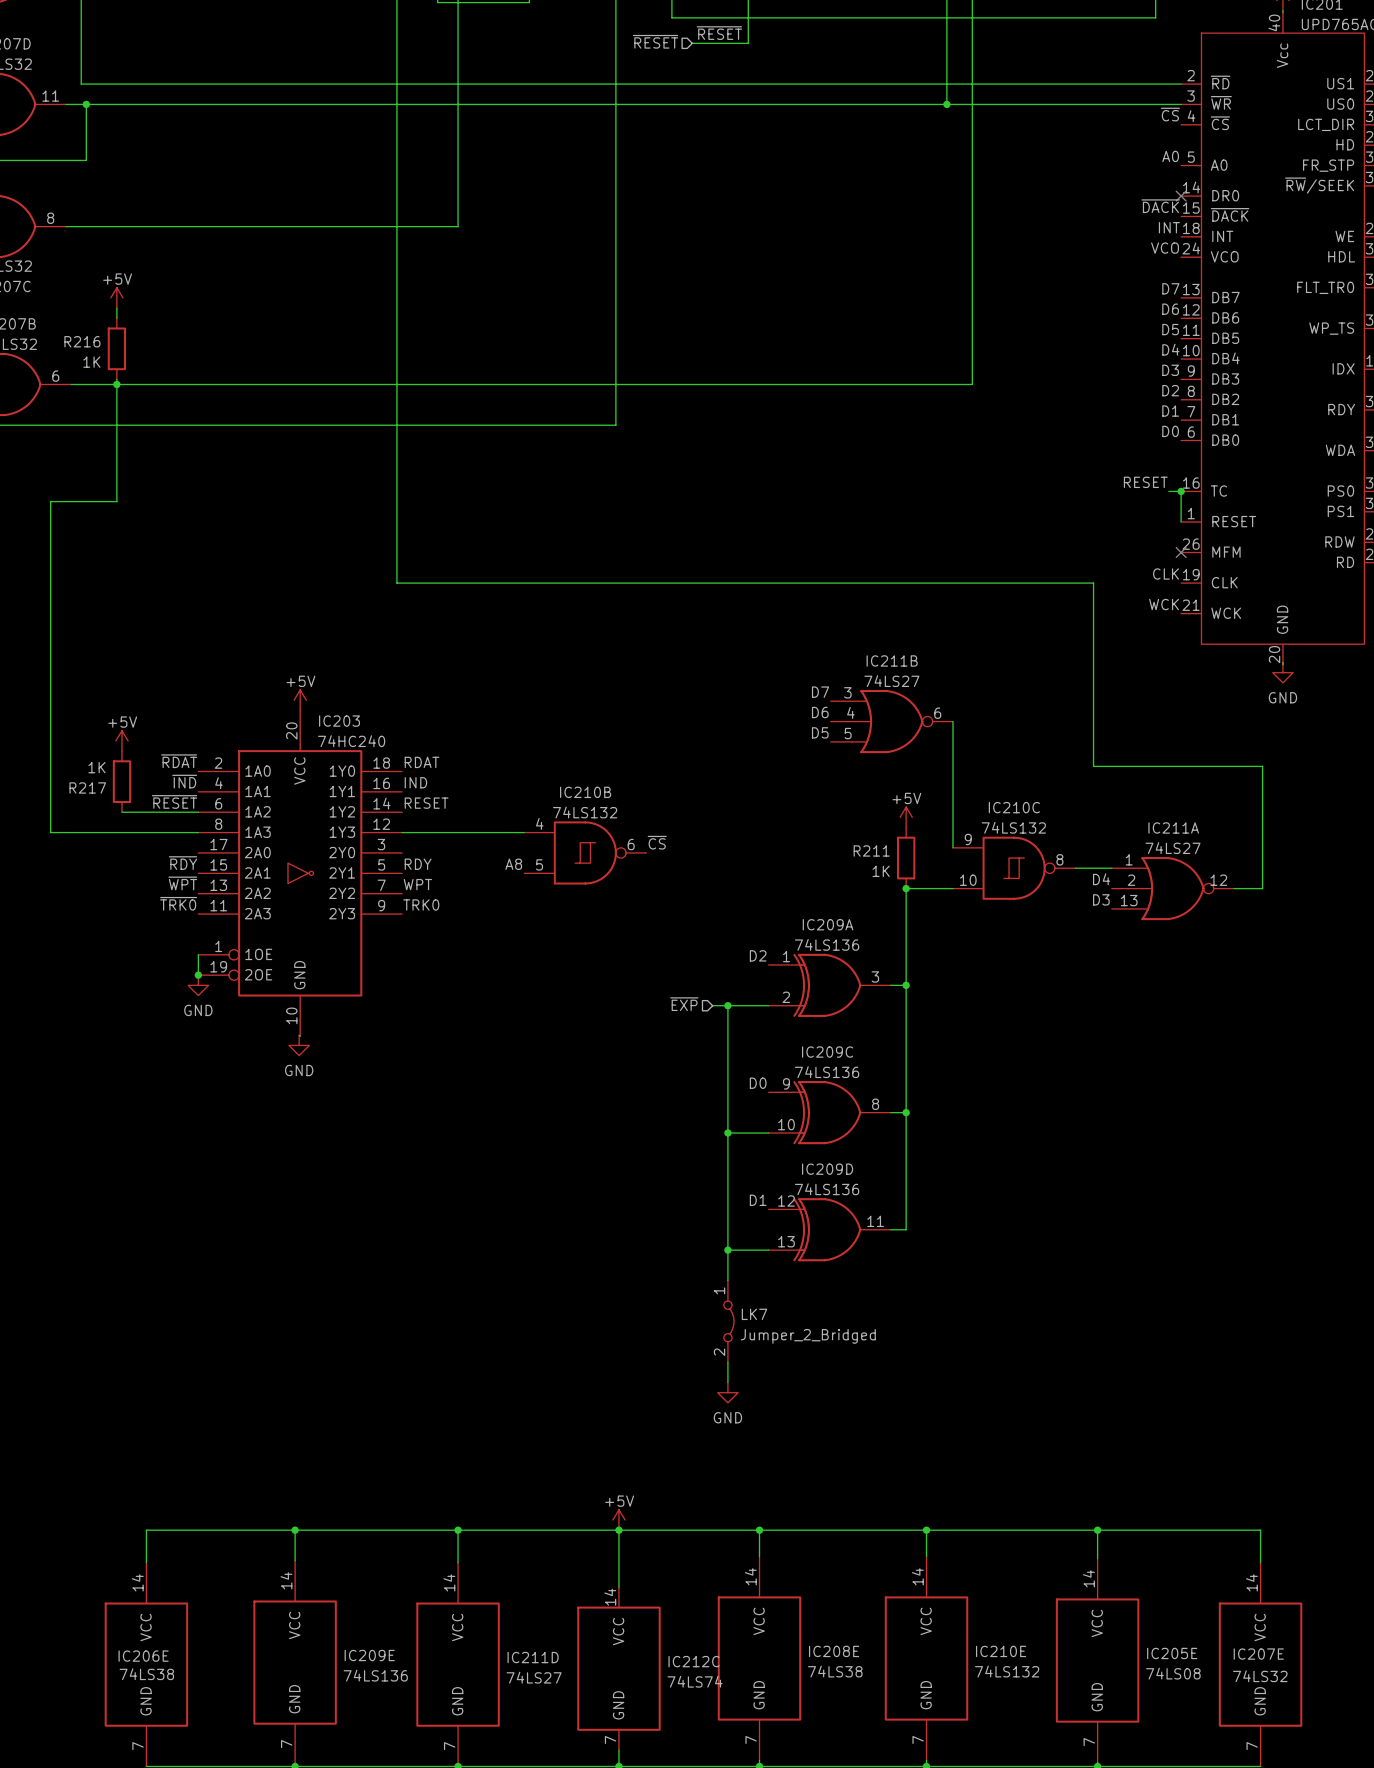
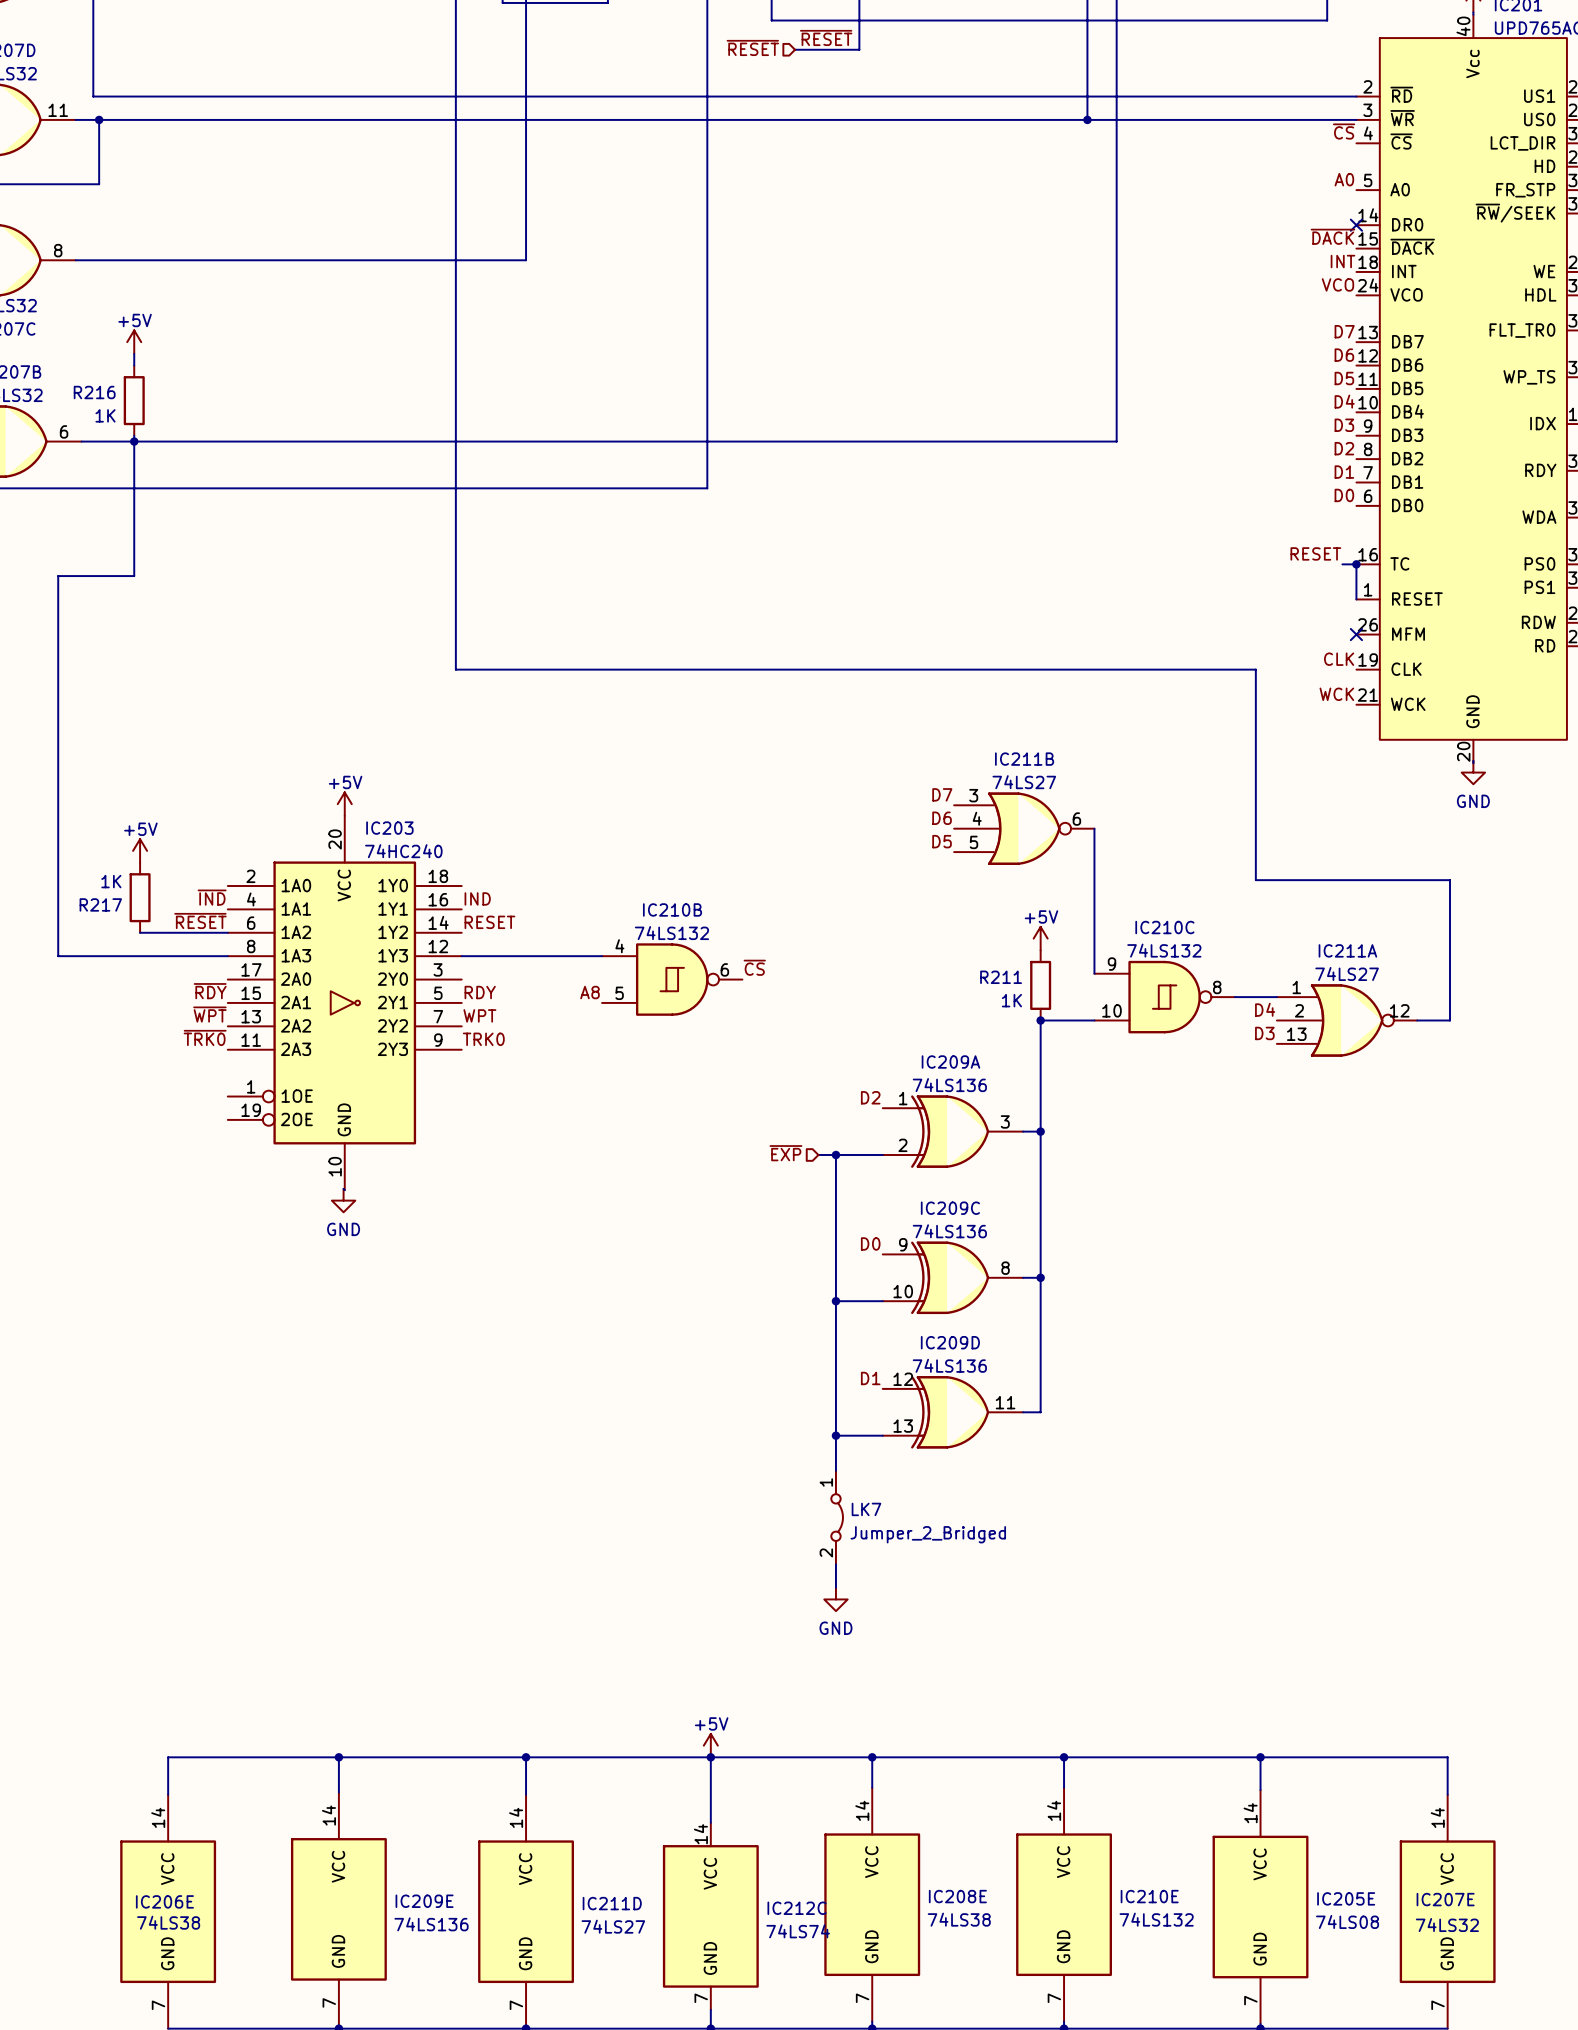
label: ~{RDAT} (179, 761) -> none
label: RDAT (422, 762) -> none
wire: (198, 954) (198, 975) -> none
junction: (198, 975) -> none
power symbol: GND (198, 985) -> none

